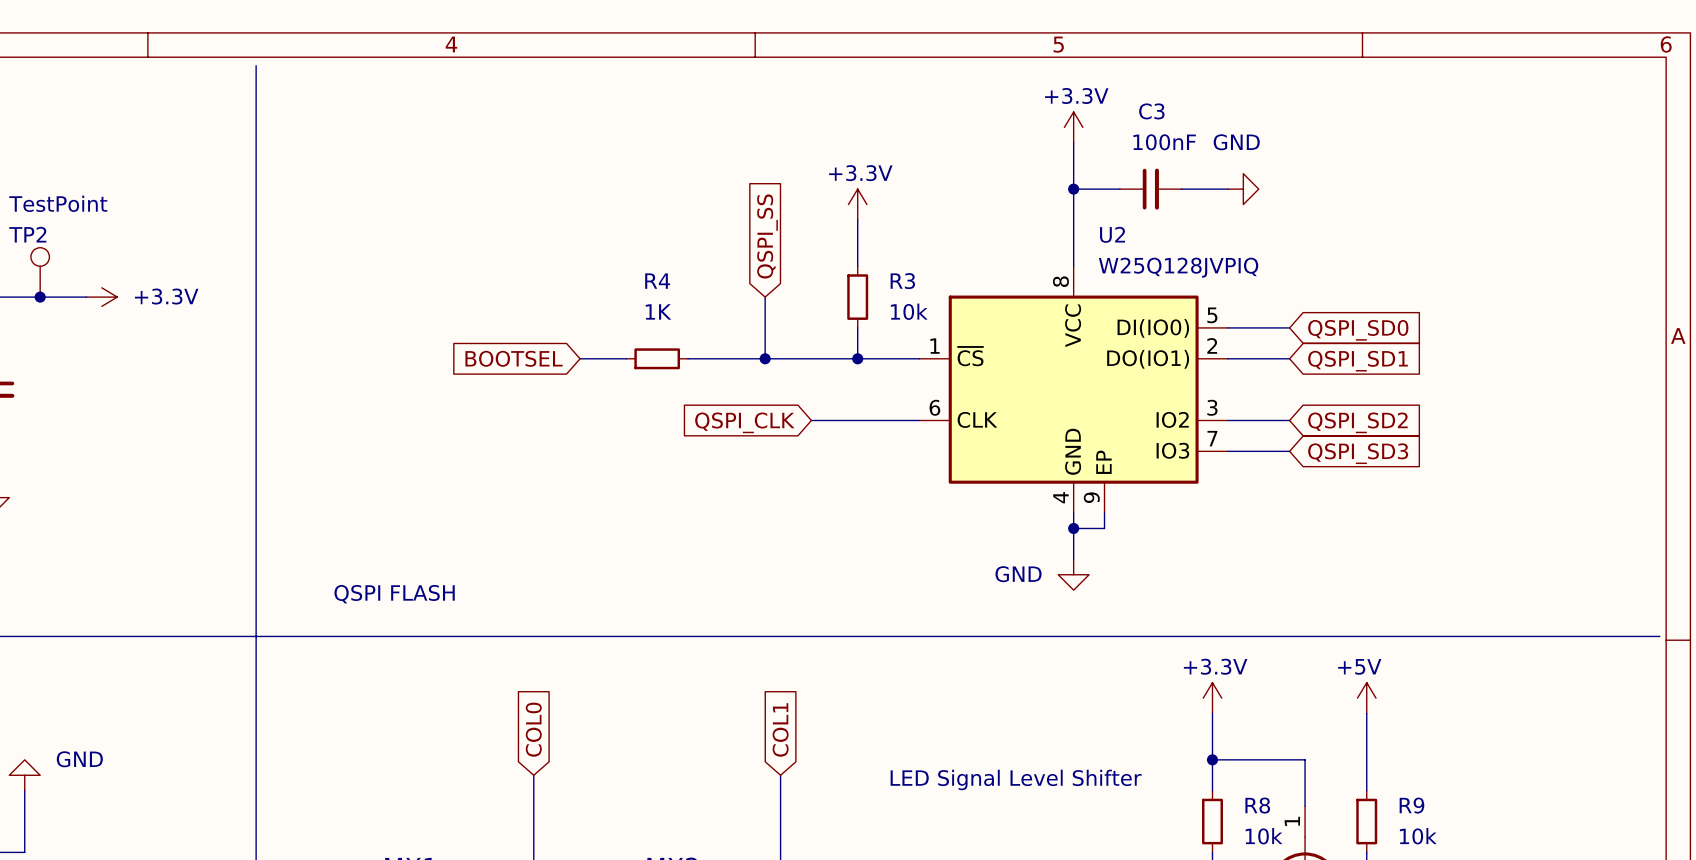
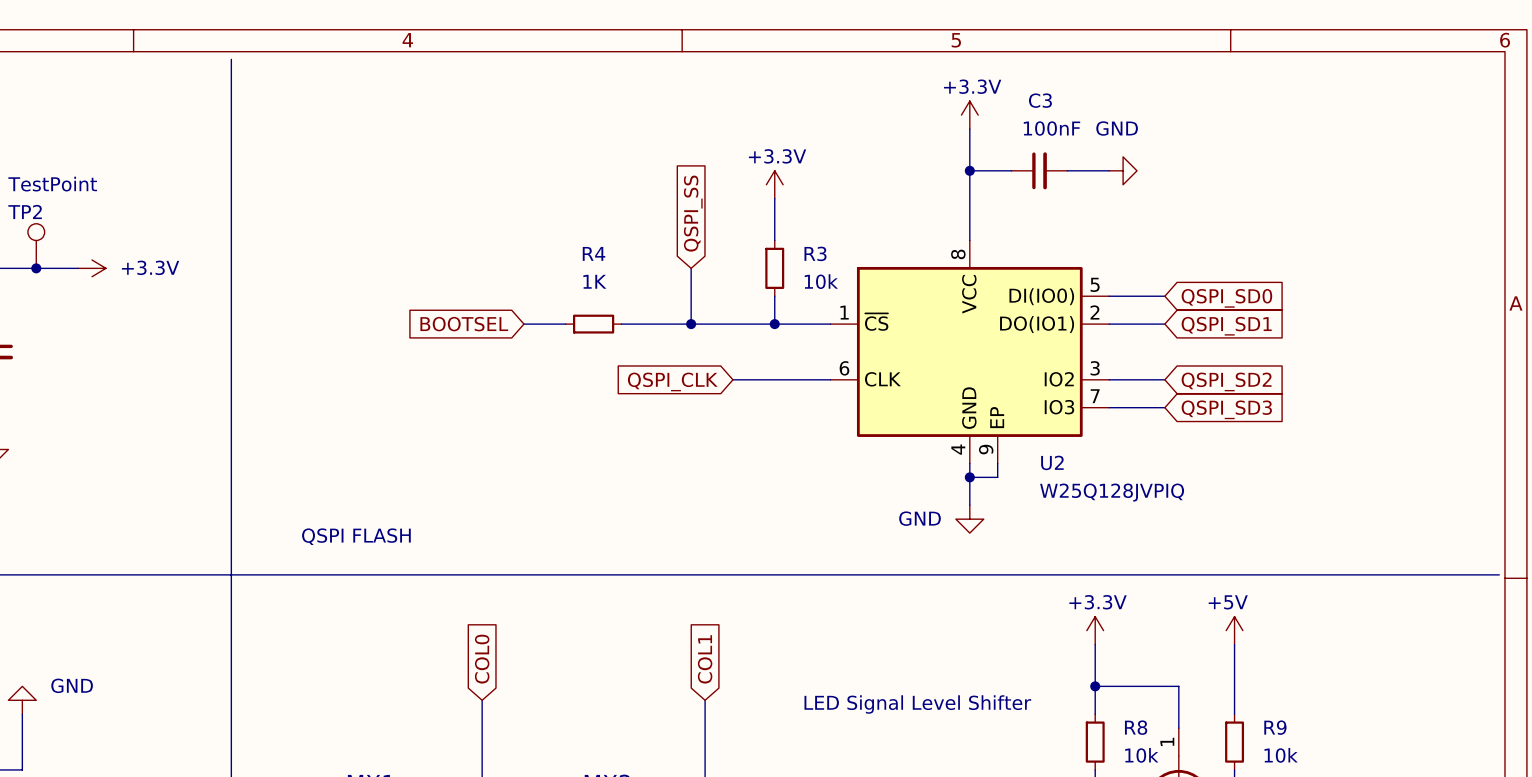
U2 name position: U2 (1112, 234) -> U2 (1052, 462)
U2 value position: W25Q128JVPIQ (1178, 267) -> W25Q128JVPIQ (1112, 492)

